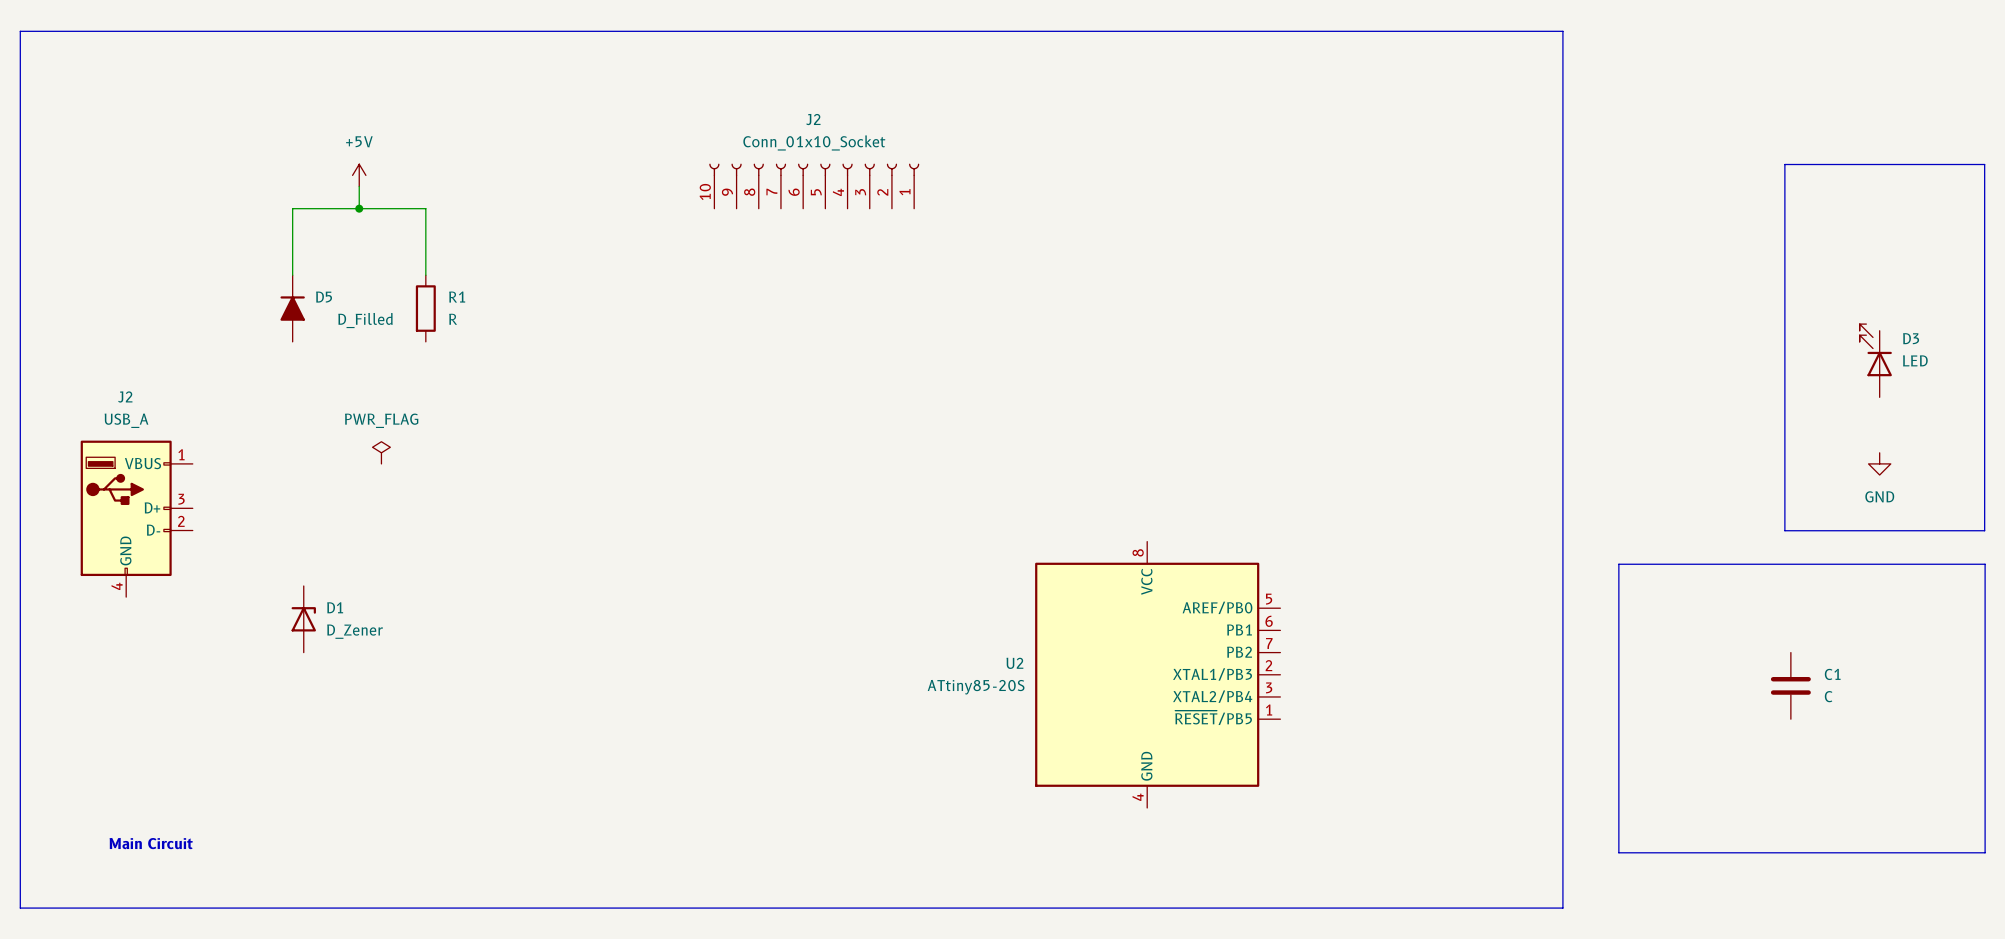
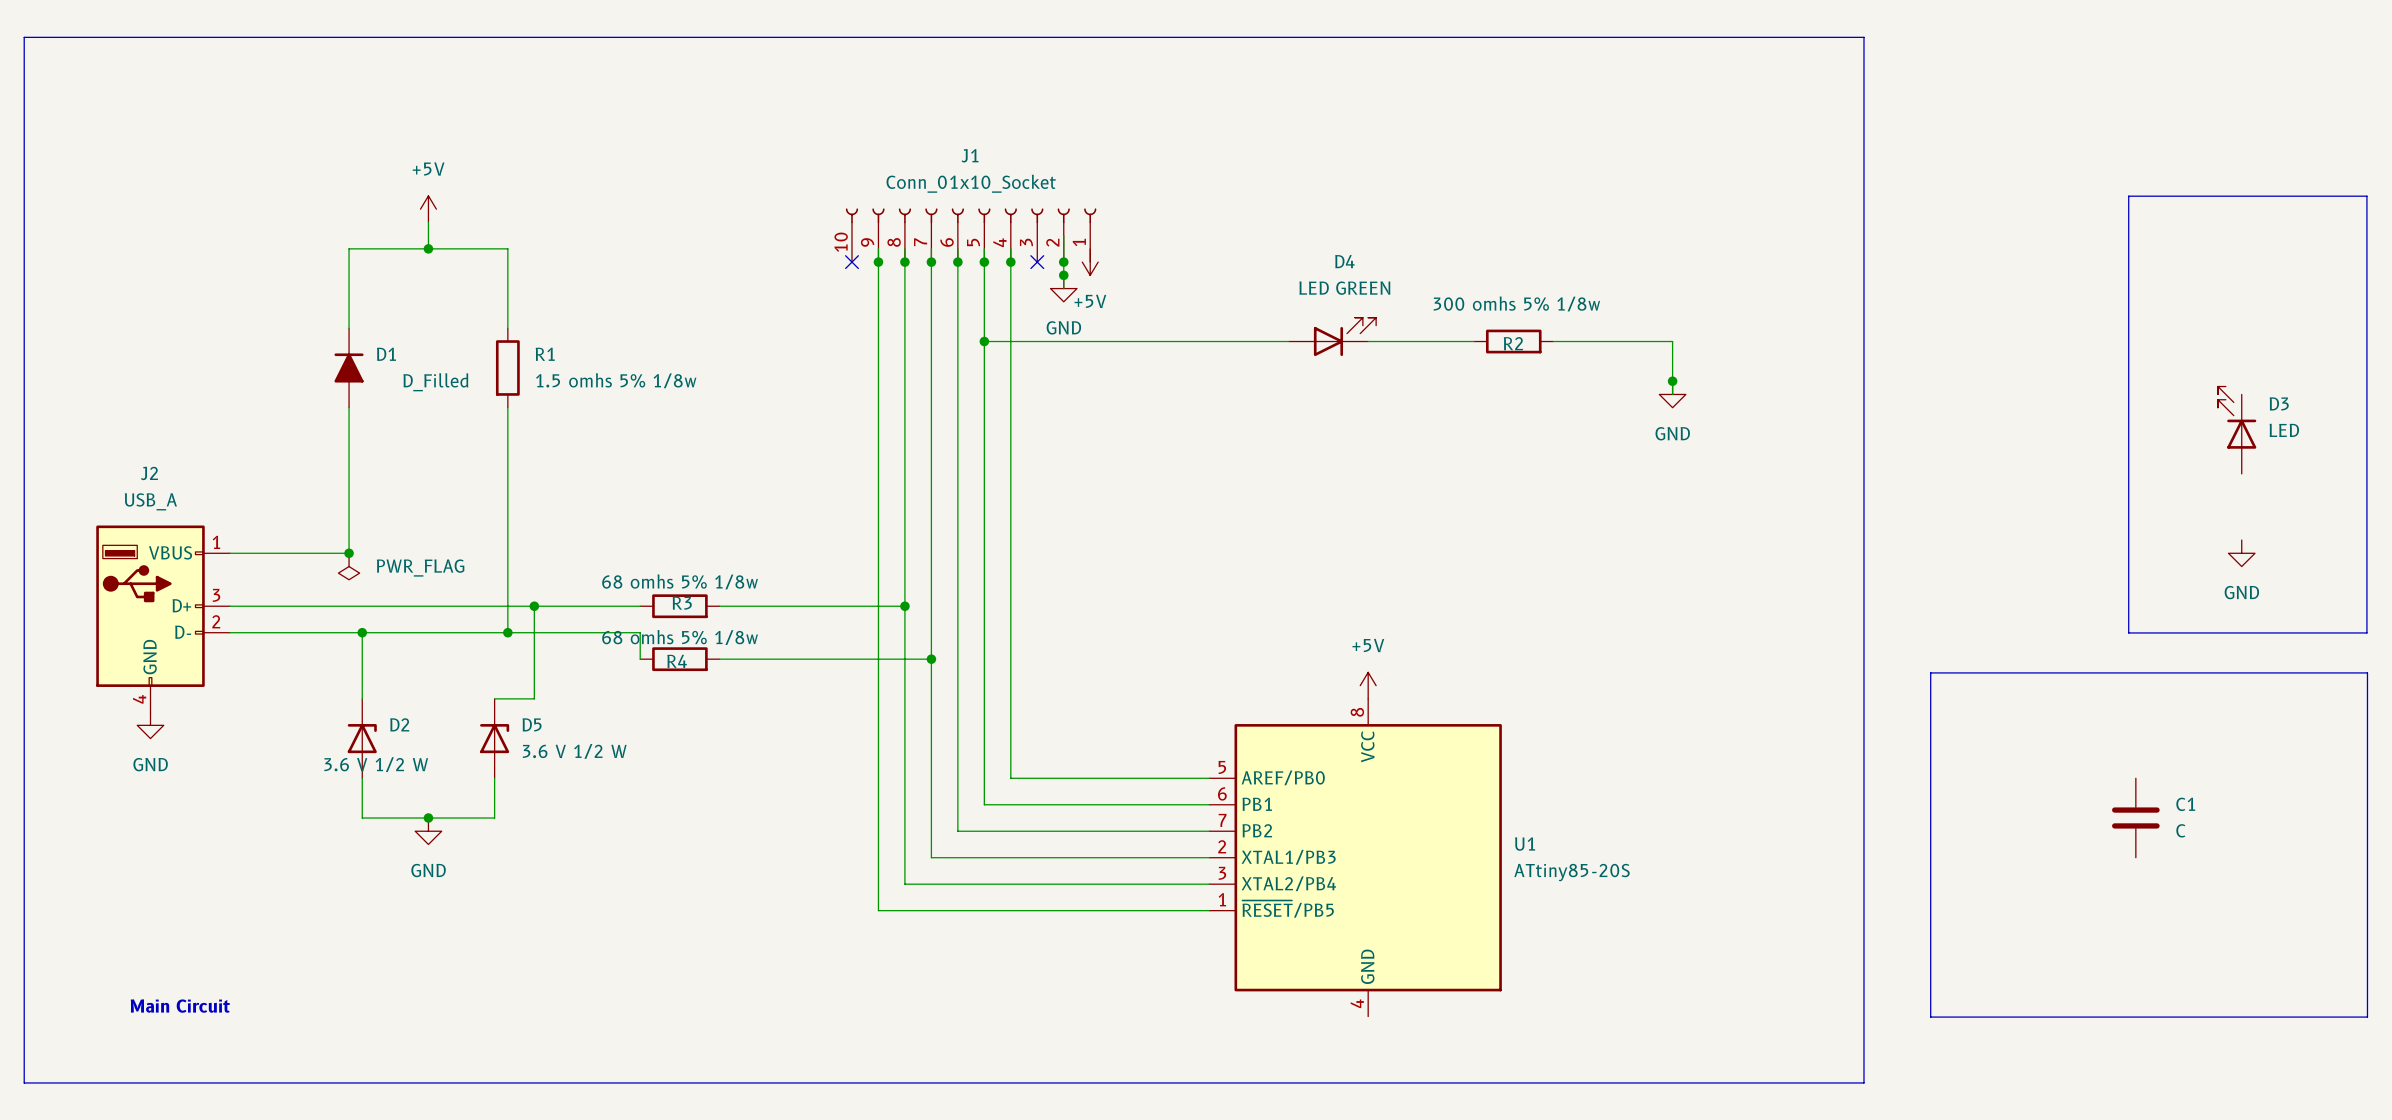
J2: Conn_01x10_Socket (814, 186) -> none
J1: none -> Conn_01x10_Socket (971, 235)
wire: none -> (1063, 235) (1063, 288)
wire: none -> (878, 248) (878, 910) (1209, 910)
wire: none -> (904, 248) (904, 884) (1209, 884)
wire: none -> (931, 248) (931, 857) (1209, 857)
wire: none -> (957, 248) (957, 831) (1209, 831)
wire: none -> (984, 248) (984, 804) (1209, 804)
wire: none -> (1010, 248) (1010, 778) (1209, 778)
no-connect mark: none -> (851, 262)
junction: none -> (878, 262)
junction: none -> (904, 262)
junction: none -> (931, 262)
junction: none -> (957, 262)
junction: none -> (984, 262)
junction: none -> (1010, 262)
no-connect mark: none -> (1037, 262)
junction: none -> (1063, 262)
power symbol: none -> +5V (1090, 262)
junction: none -> (1063, 275)
power symbol: none -> GND (1063, 288)
D4: none -> LED GREEN (1332, 336)
wire: none -> (984, 341) (1288, 341)
junction: none -> (984, 341)
wire: none -> (1368, 341) (1474, 341)
R2: none -> 300 omhs 5% 1/8w (1513, 341)
wire: none -> (1553, 341) (1672, 341) (1672, 394)
D5 name: D5 (324, 297) -> D1 (386, 354)
R1 value: R (453, 319) -> 1.5 omhs 5% 1/8w (616, 380)
junction: none -> (1672, 381)
power symbol: none -> GND (1672, 394)
wire: none -> (349, 407) (349, 553) (229, 553)
wire: none -> (507, 407) (507, 632)
power symbol text position: PWR_FLAG (381, 420) -> PWR_FLAG (420, 568)
power symbol rotation: 0° (381, 452) -> 180° (349, 566)
power symbol position: PWR_FLAG (381, 452) -> PWR_FLAG (349, 566)
junction: none -> (349, 553)
wire: none -> (229, 606) (640, 606)
wire: none -> (534, 606) (534, 698) (494, 698)
junction: none -> (534, 606)
R3: none -> 68 omhs 5% 1/8w (679, 606)
wire: none -> (719, 606) (904, 606)
junction: none -> (904, 606)
wire: none -> (229, 632) (640, 632) (640, 659)
wire: none -> (362, 632) (362, 698)
junction: none -> (362, 632)
junction: none -> (507, 632)
R4: none -> 68 omhs 5% 1/8w (679, 659)
wire: none -> (719, 659) (931, 659)
junction: none -> (931, 659)
power symbol: none -> +5V (1368, 685)
D1 name: D1 (335, 607) -> D2 (399, 724)
power symbol: none -> GND (150, 725)
D5: none -> 3.6 V 1/2 W (494, 738)
D1 value: D_Zener (355, 631) -> 3.6 V 1/2 W (376, 764)
wire: none -> (362, 778) (362, 818) (494, 818) (494, 778)
U2: ATtiny85-20S (1157, 674) -> none
junction: none -> (428, 818)
power symbol: none -> GND (428, 831)
U1: none -> ATtiny85-20S (1355, 857)

